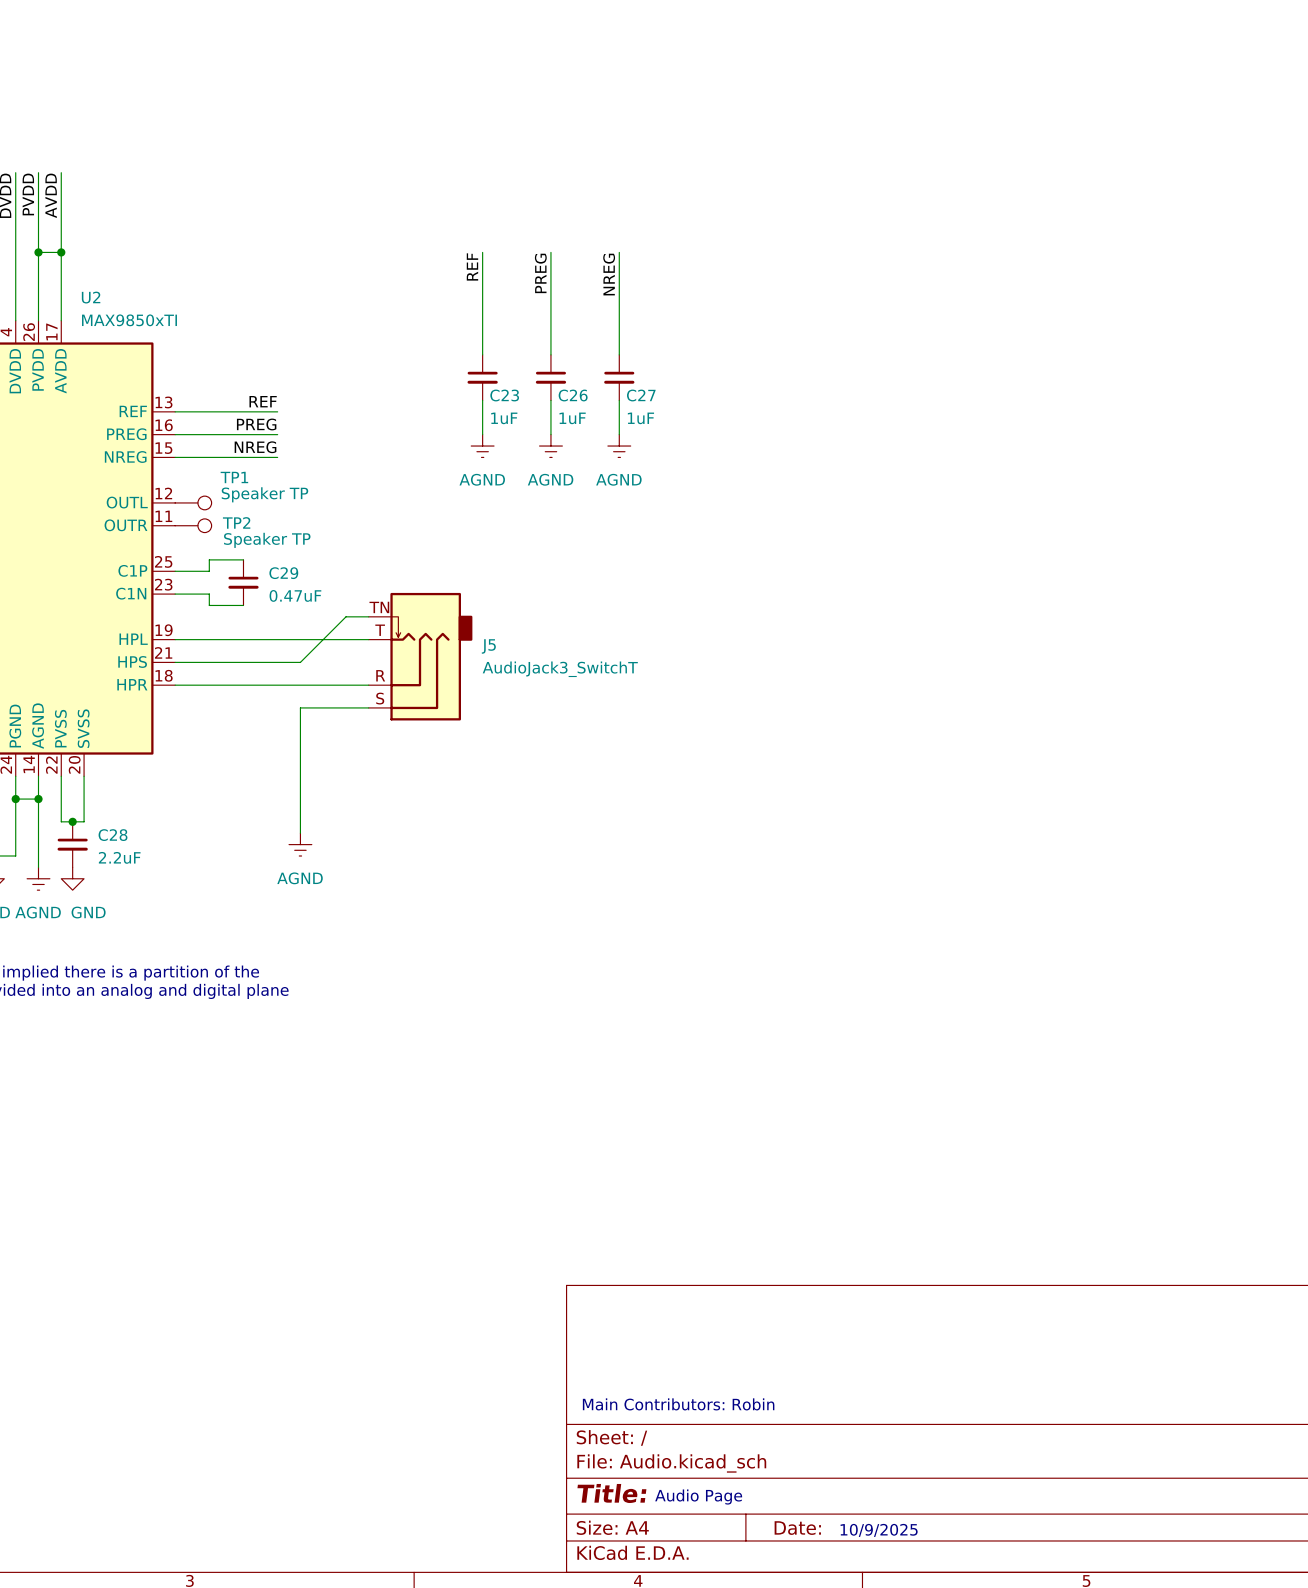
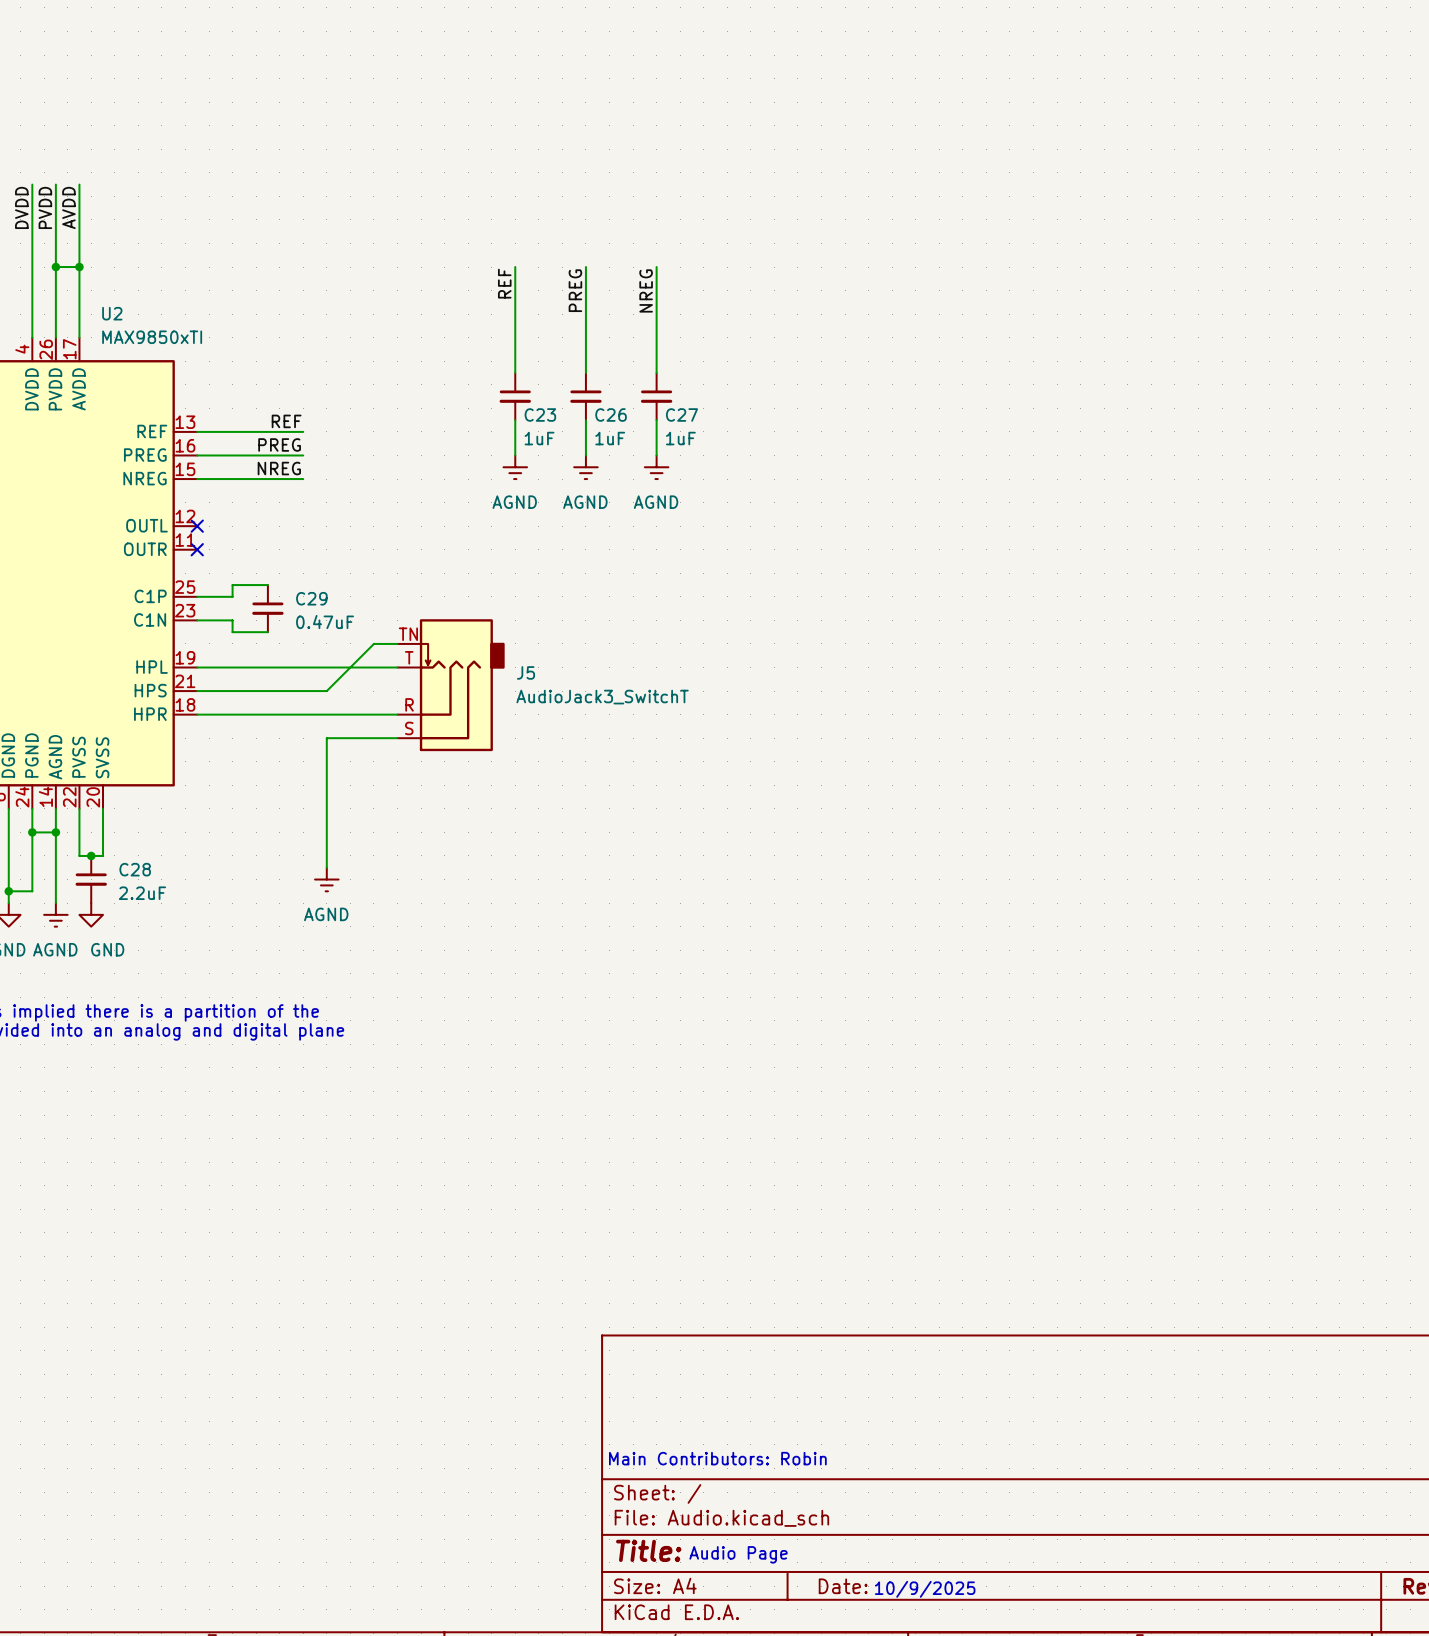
no-connect mark: none -> (197, 526)
TP1: Speaker TP (193, 502) -> none
no-connect mark: none -> (197, 549)
TP2: Speaker TP (193, 525) -> none

